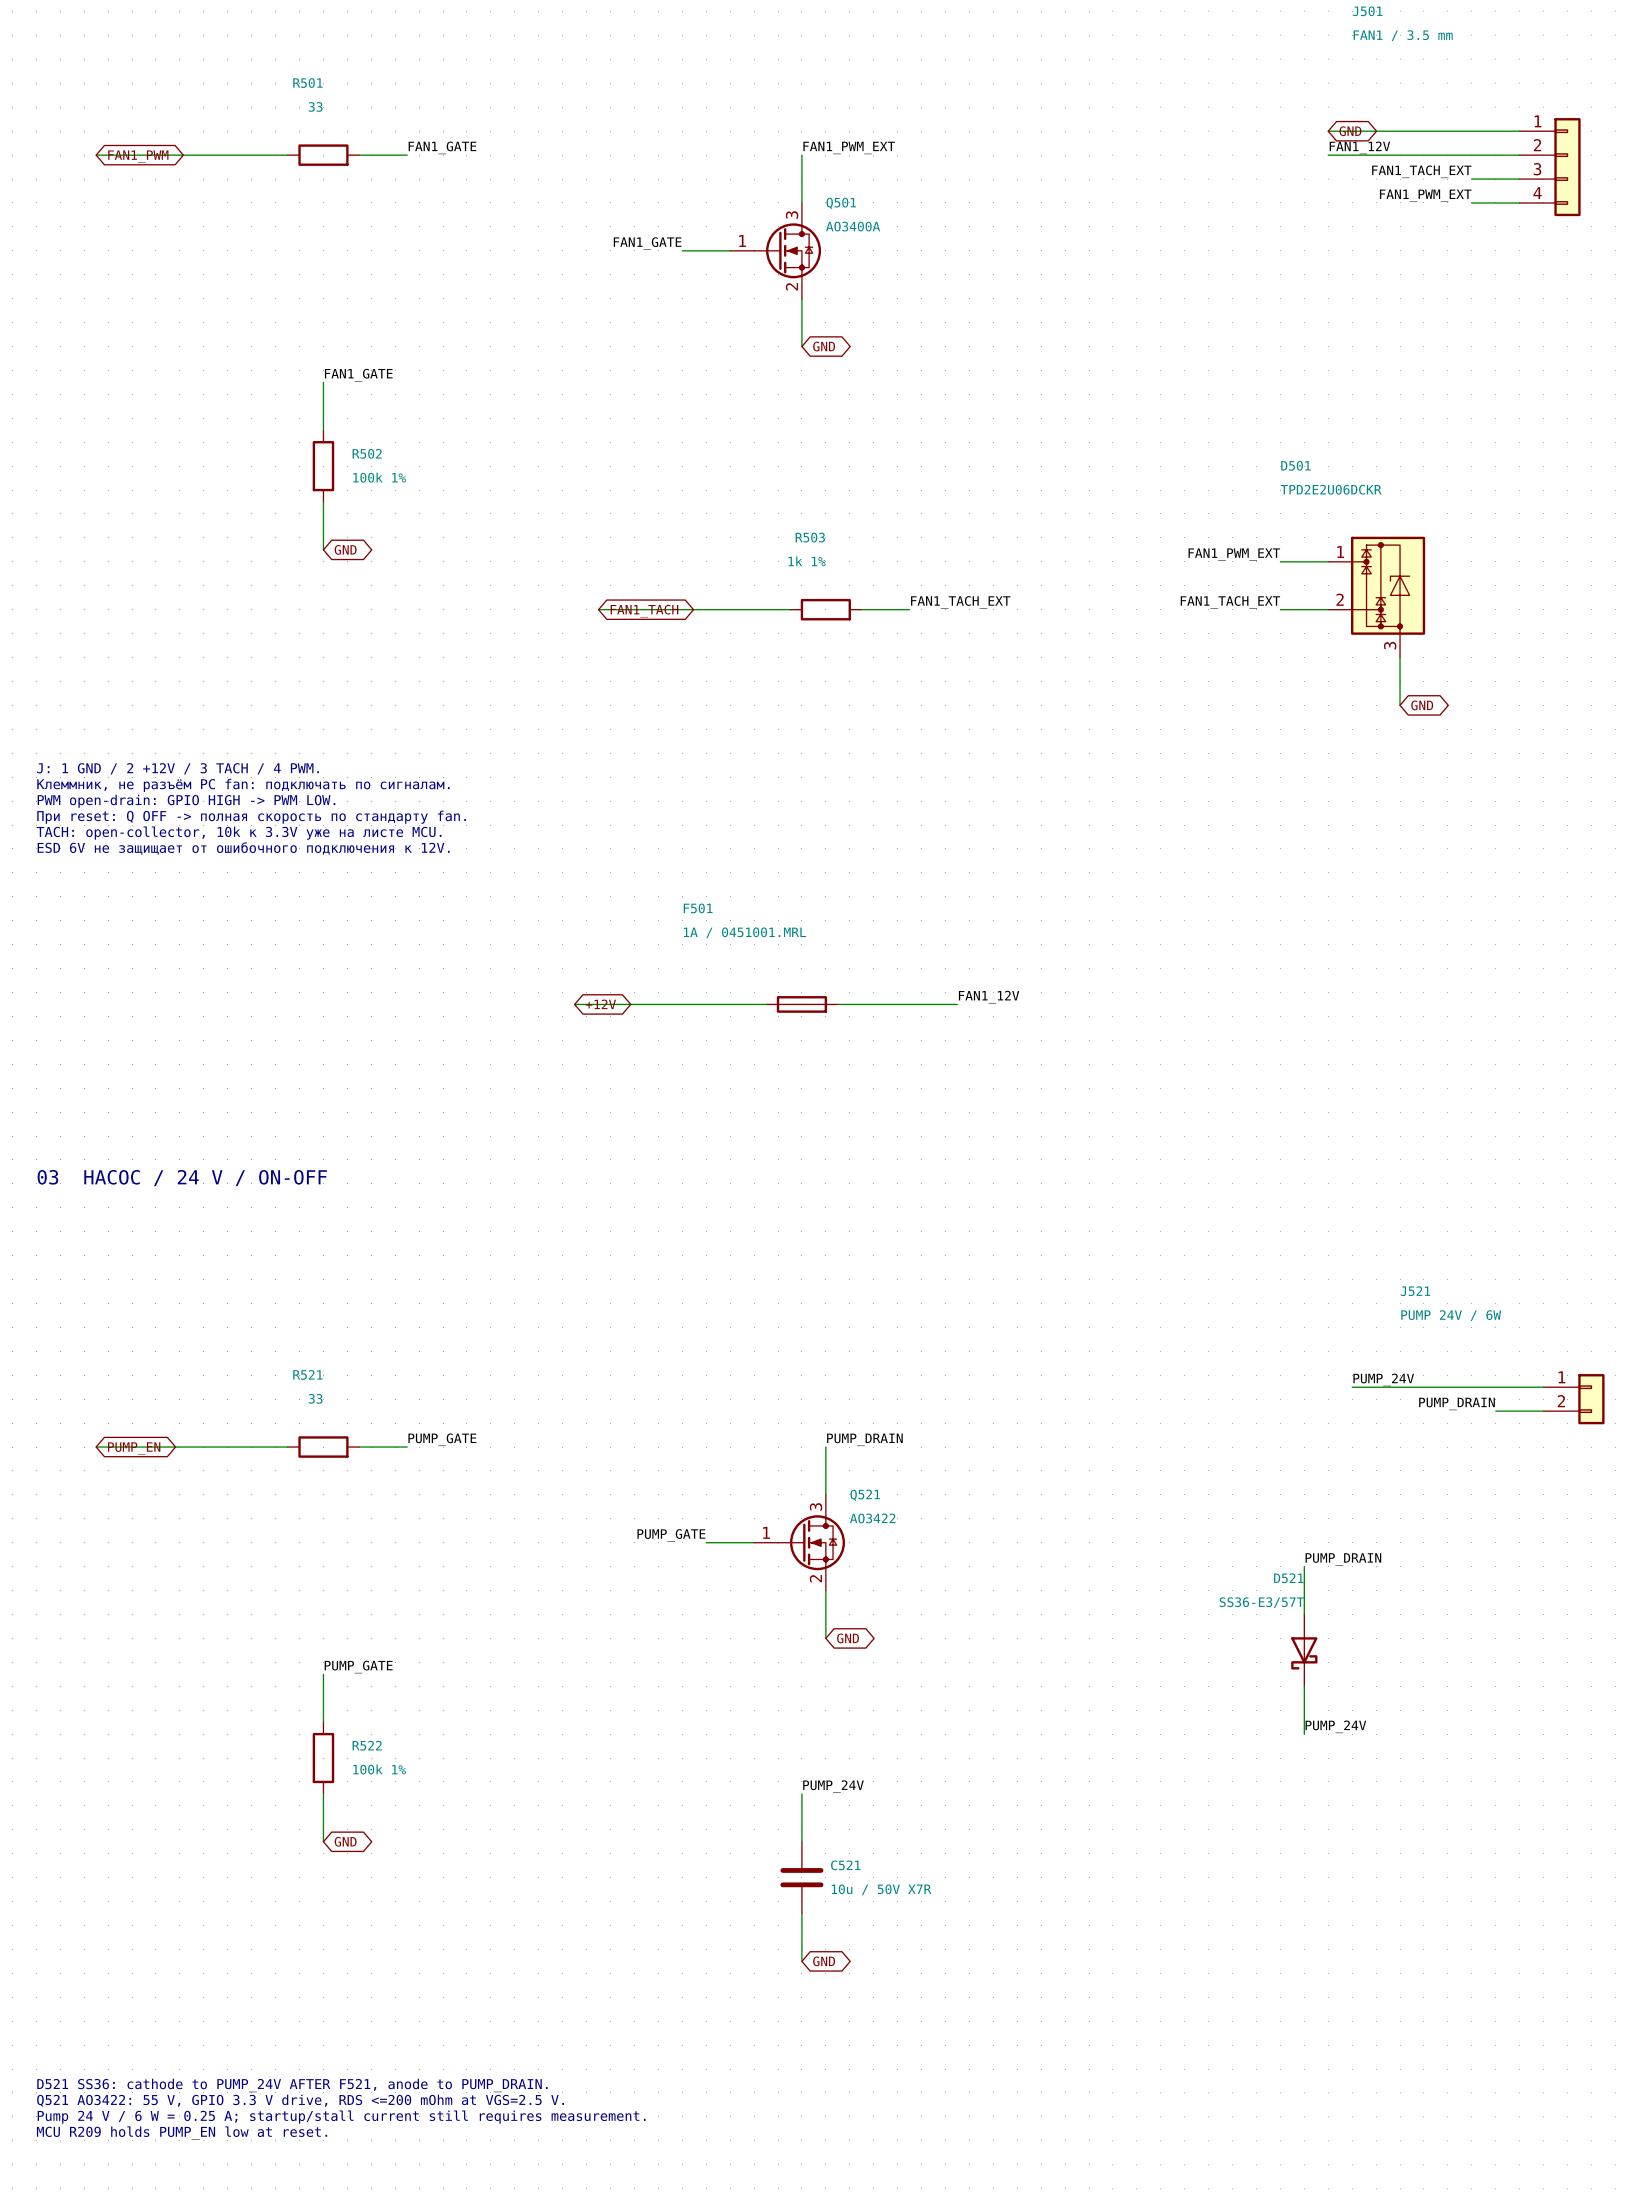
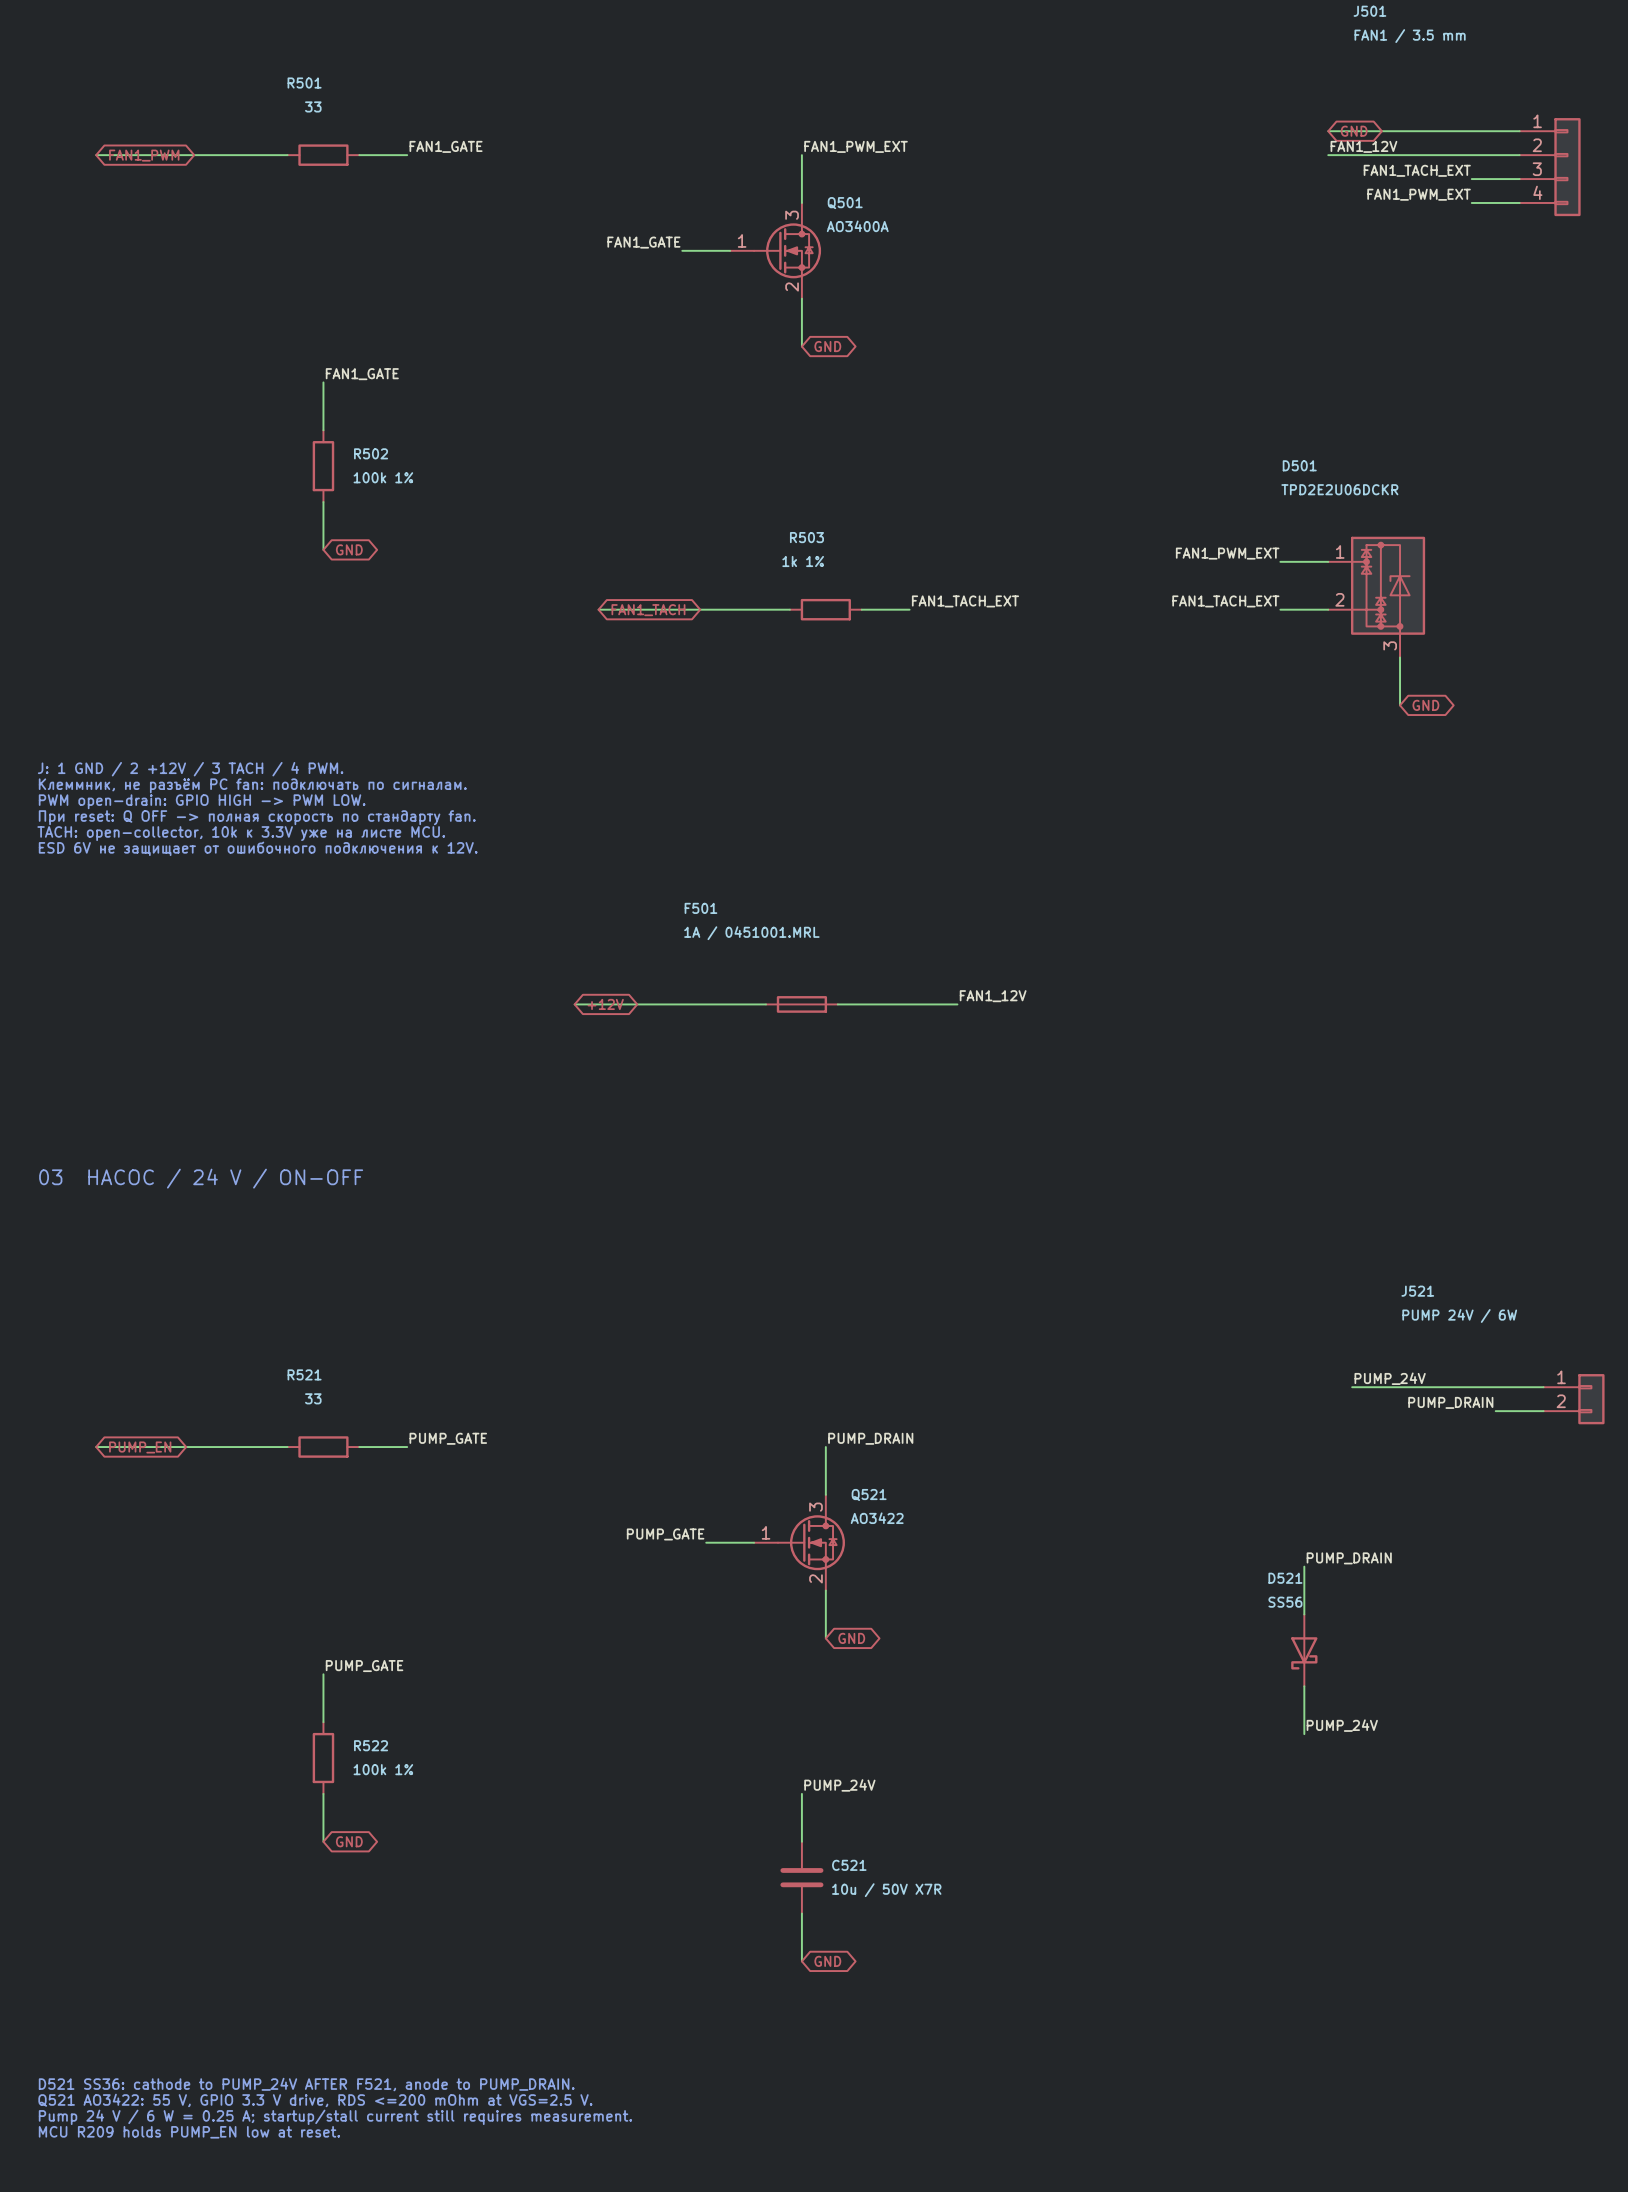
D521 value: SS36-E3/57T (1261, 1602) -> SS56 (1285, 1602)

